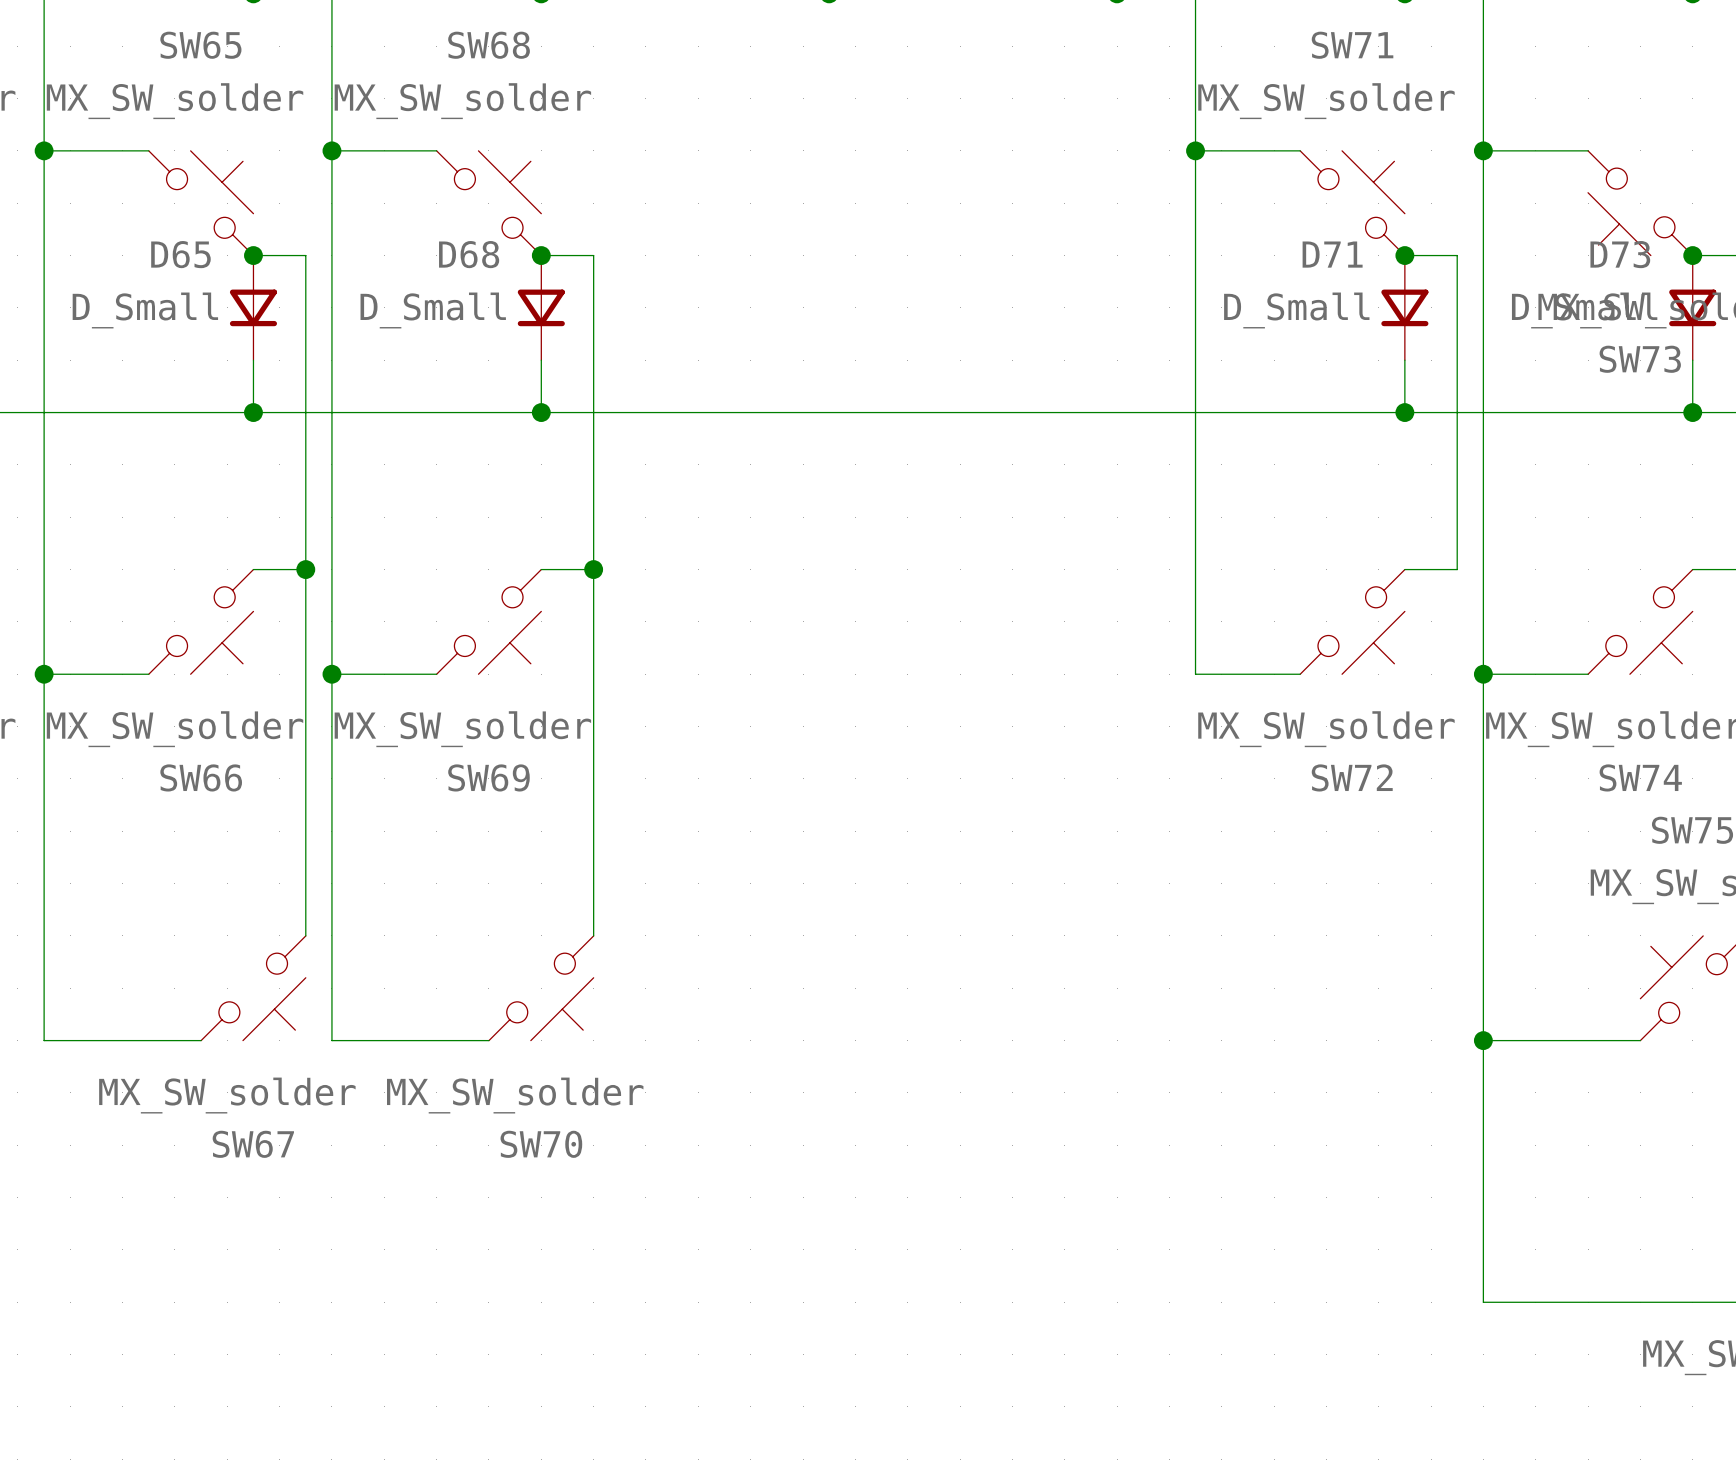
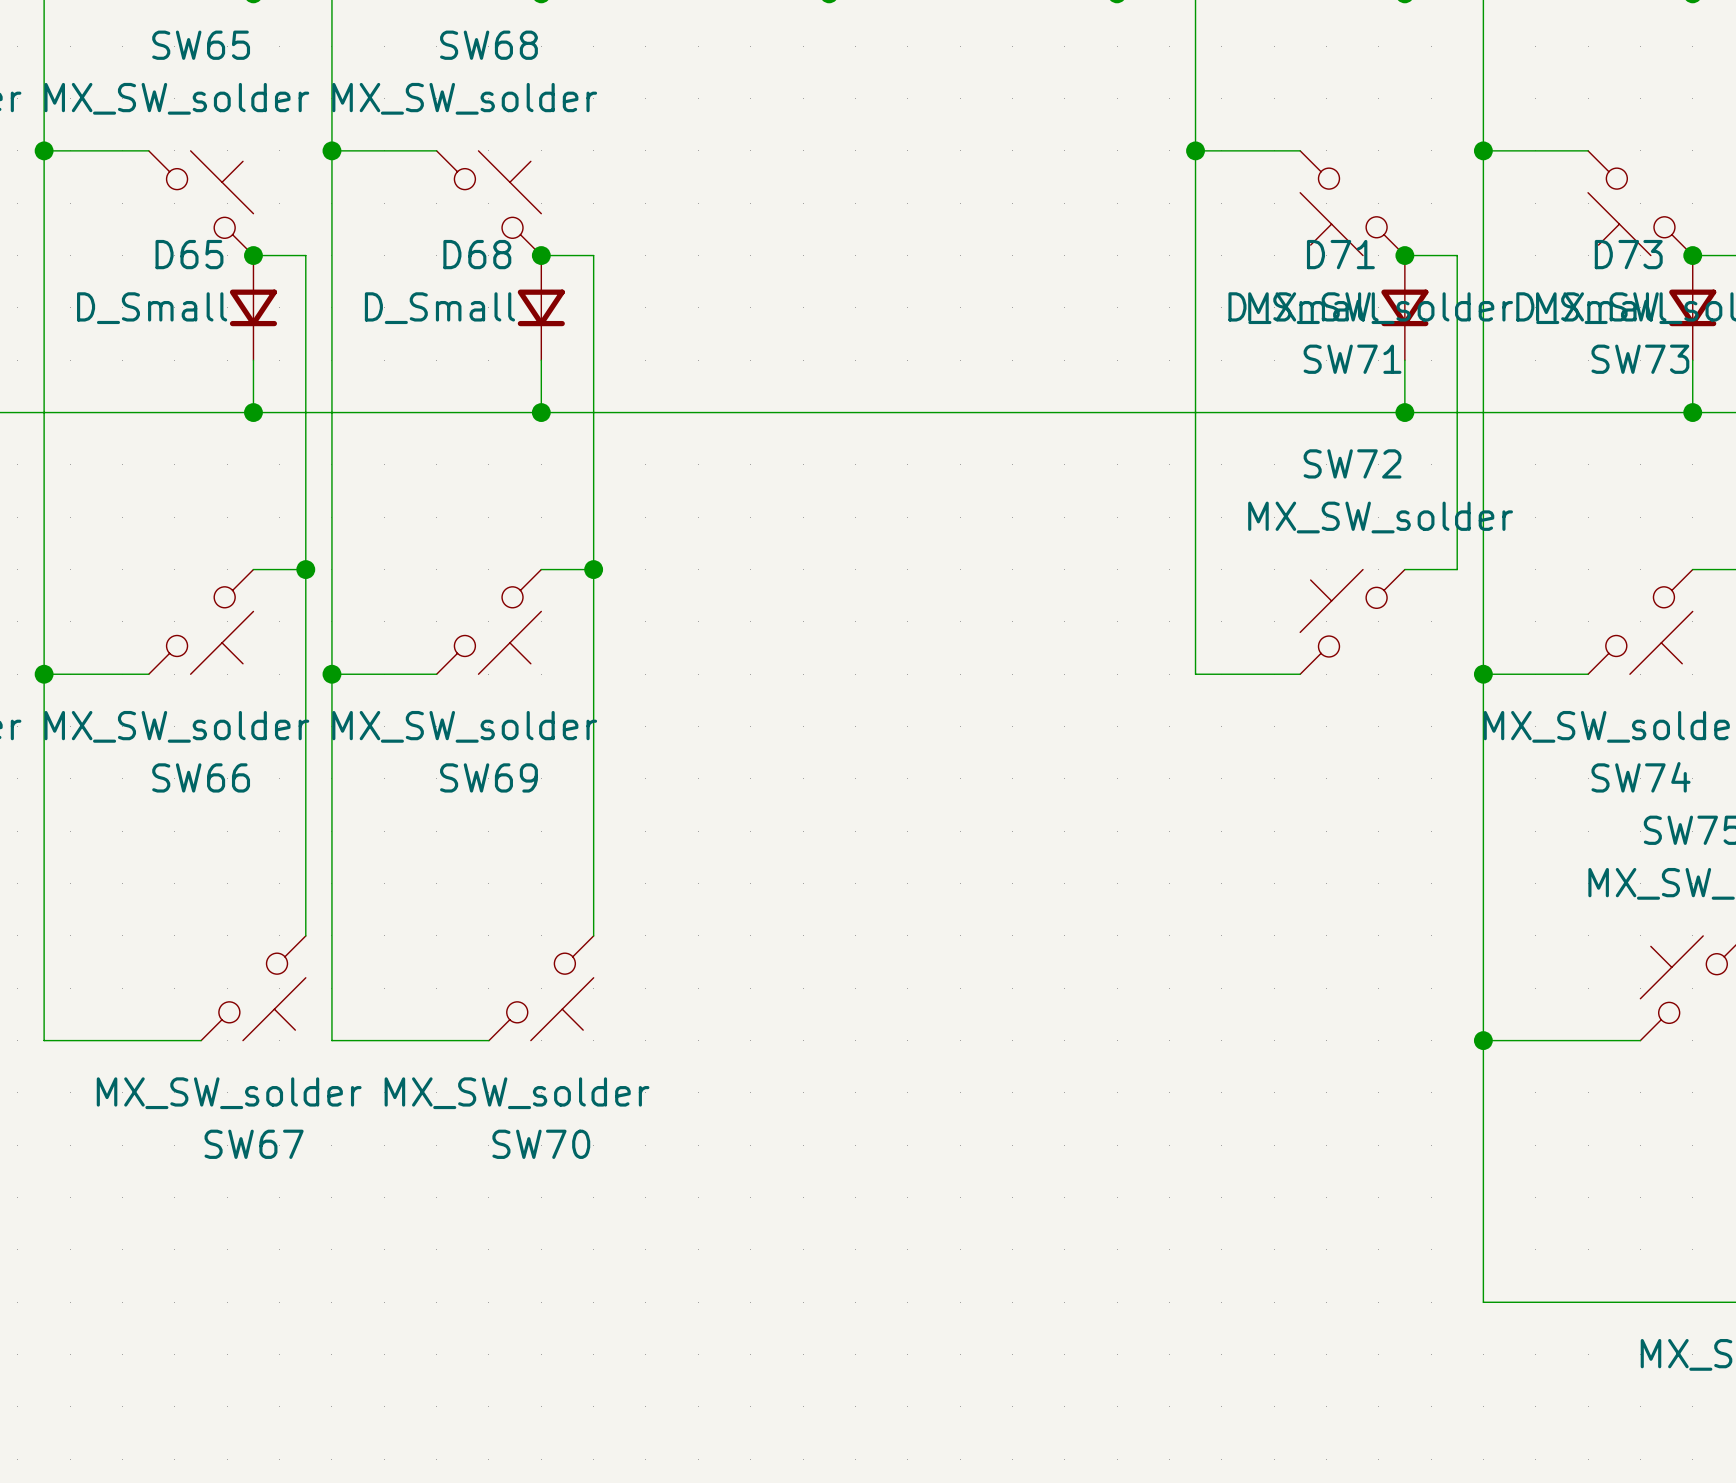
SW71 rotation: 0° (1352, 203) -> 180° (1352, 203)
SW72 rotation: 0° (1352, 621) -> 180° (1352, 621)

